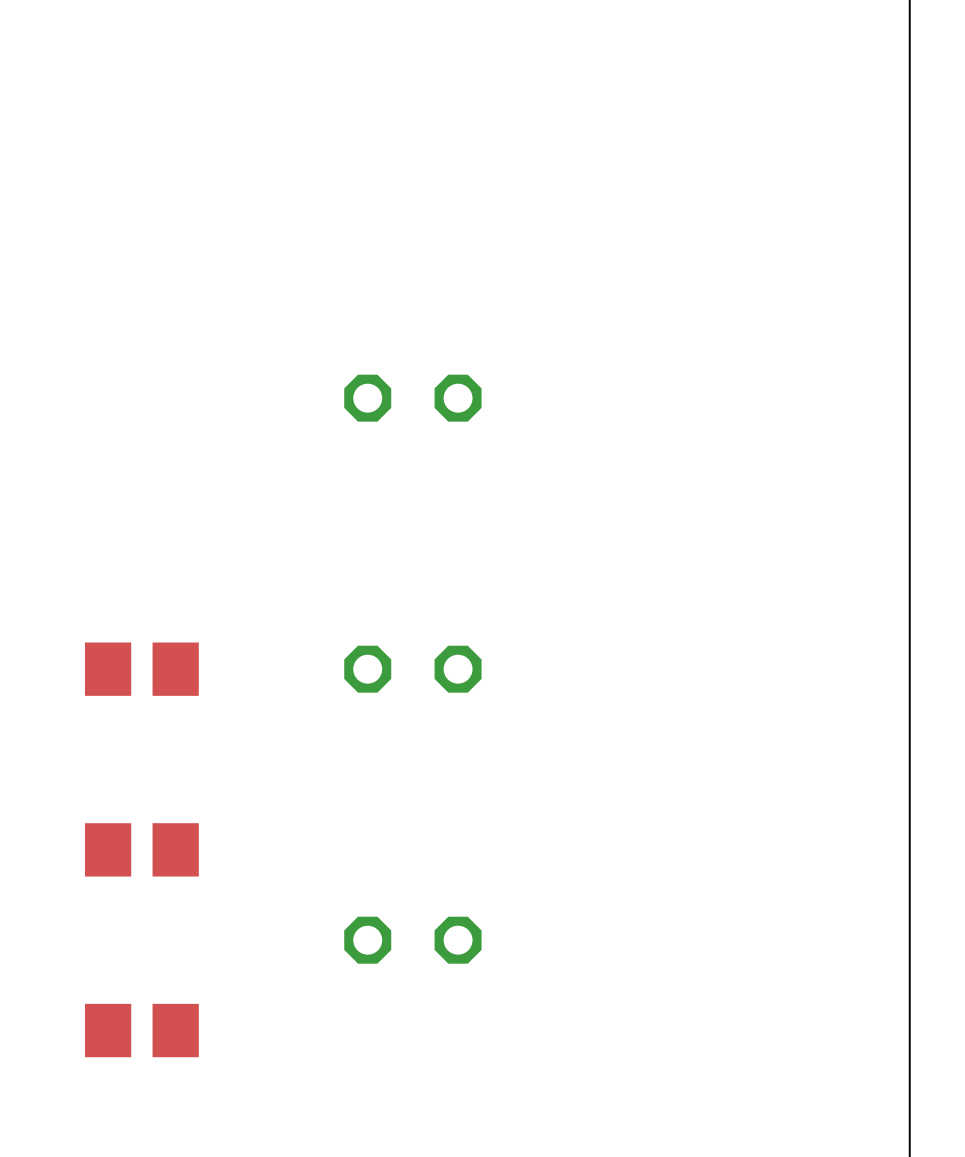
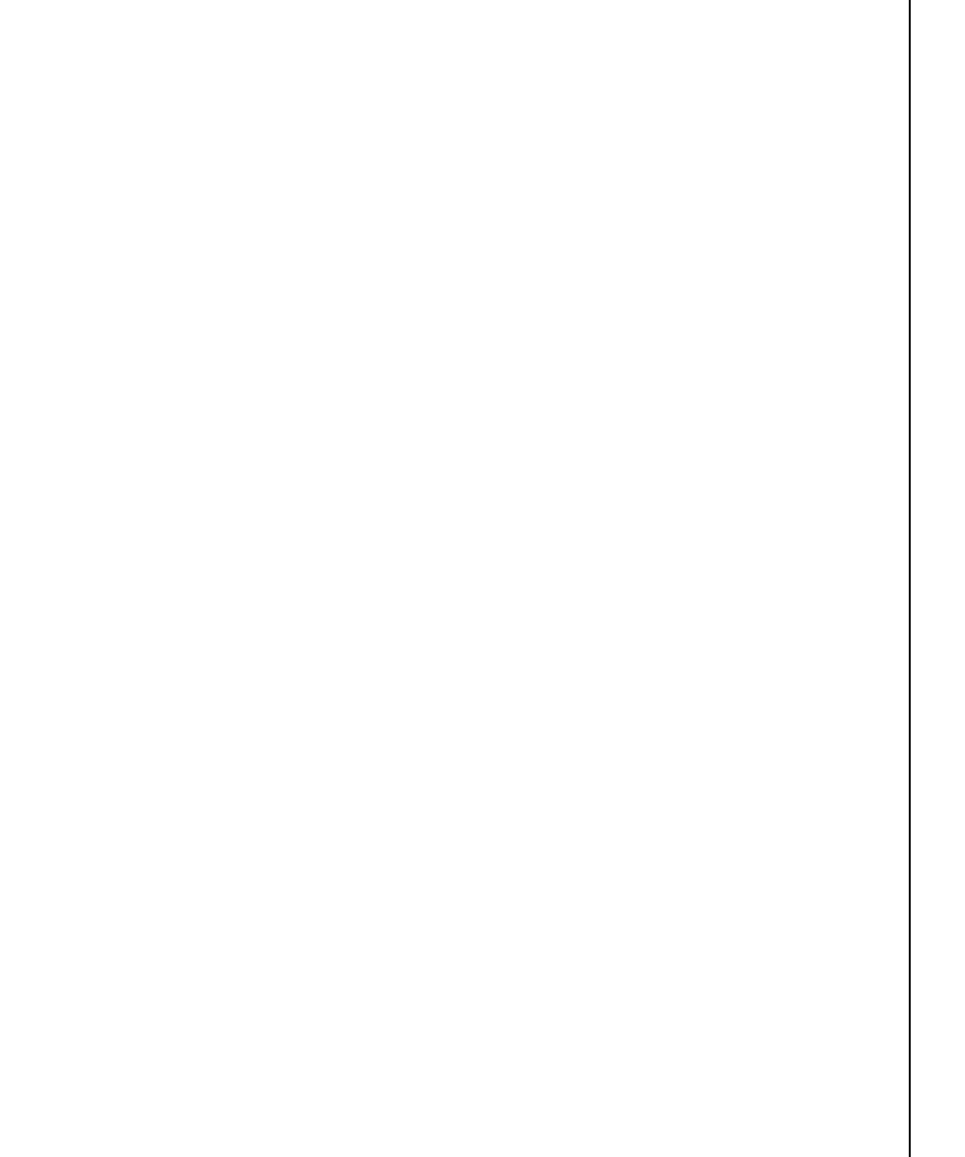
part: (412, 398) -> none
part: (141, 669) -> none
part: (412, 669) -> none
part: (141, 849) -> none
part: (412, 940) -> none
part: (141, 1030) -> none

